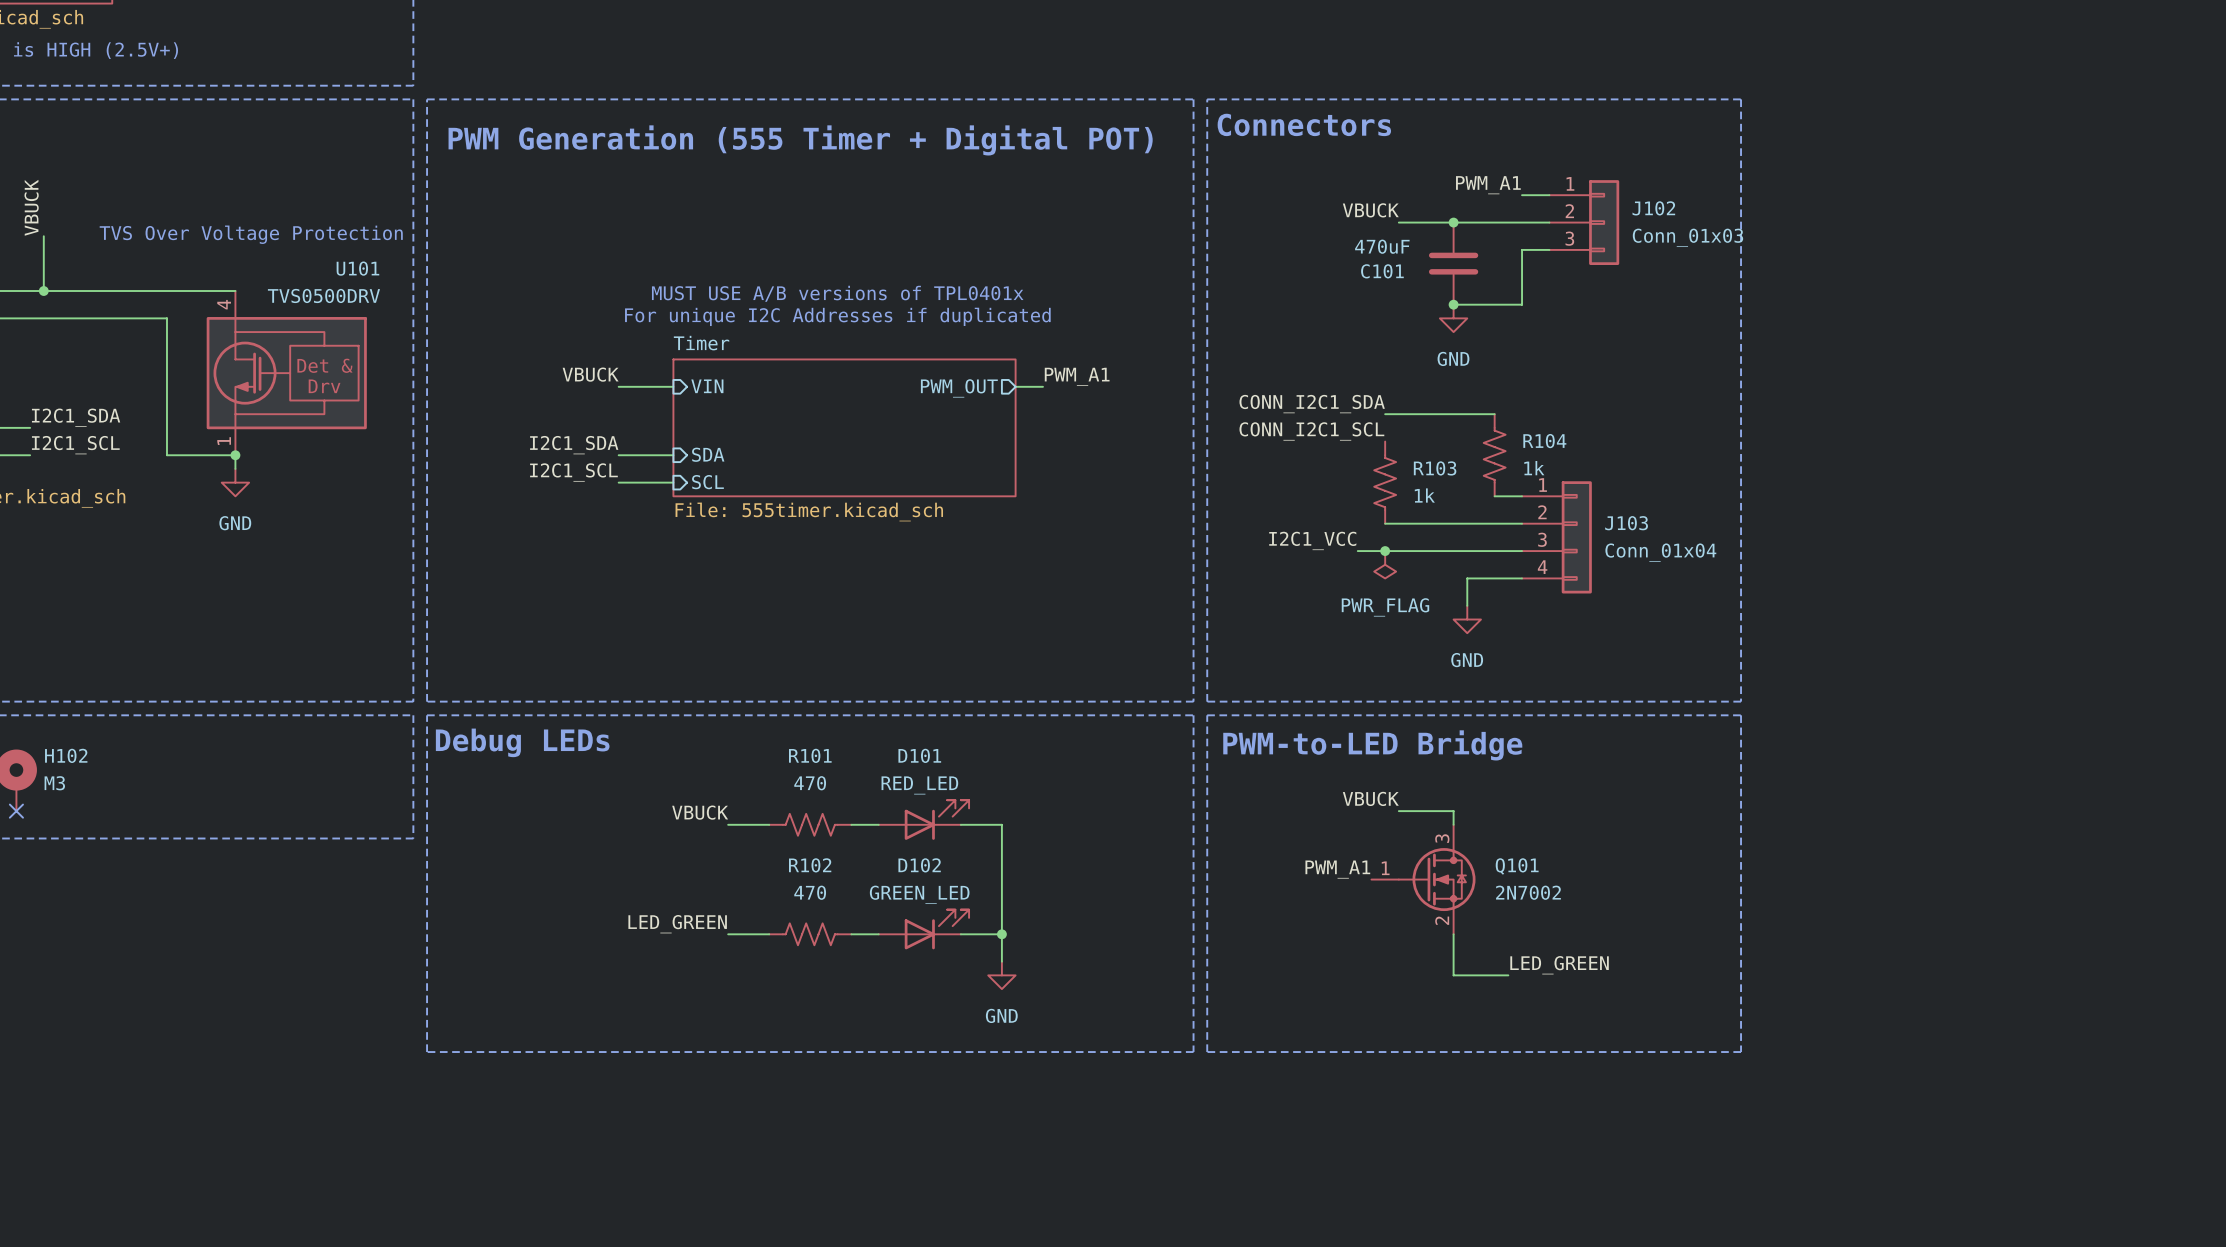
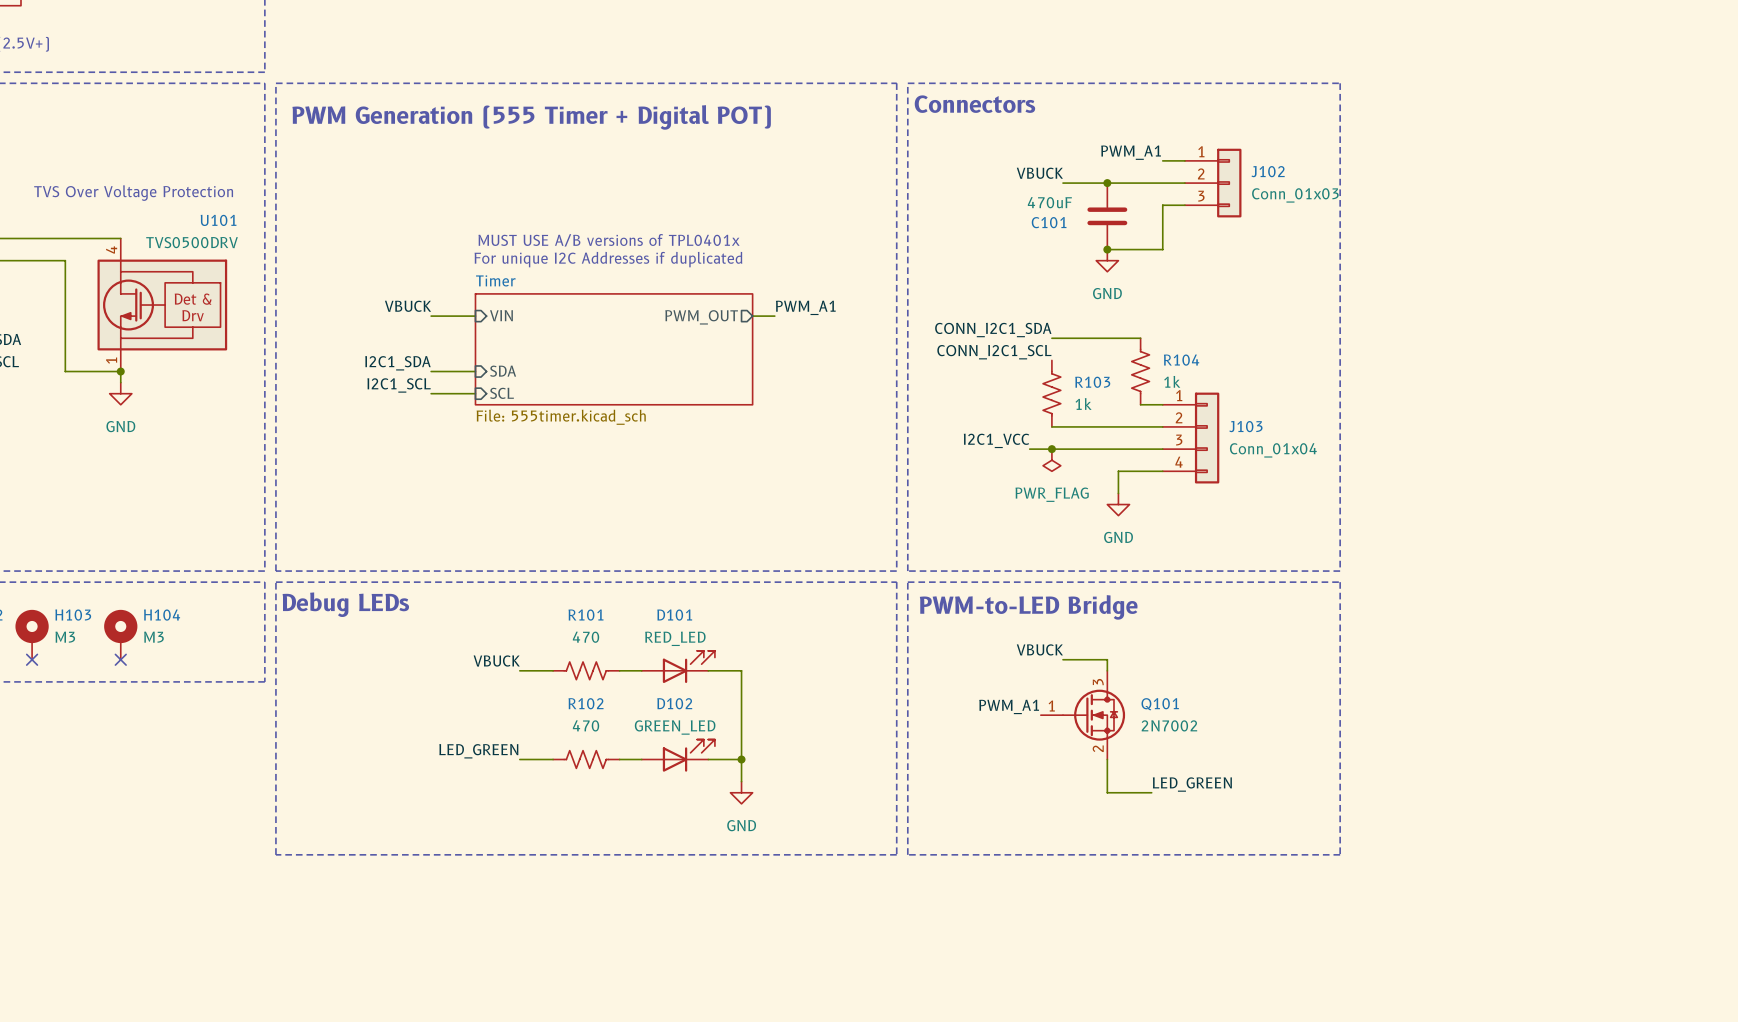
H103: none -> M3 (32, 634)
H104: none -> M3 (120, 634)
no-connect mark: none -> (32, 659)
no-connect mark: none -> (120, 659)

